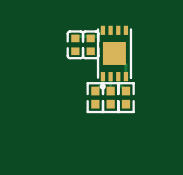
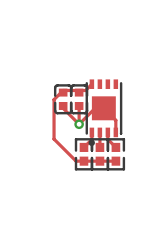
track: none -> (63, 90) (54, 99) (54, 139) (76, 161) (115, 161)
track: none -> (63, 108) (79, 124)
track: none -> (79, 108) (79, 124)
track: none -> (95, 108) (79, 124)
via: none -> (79, 124)

